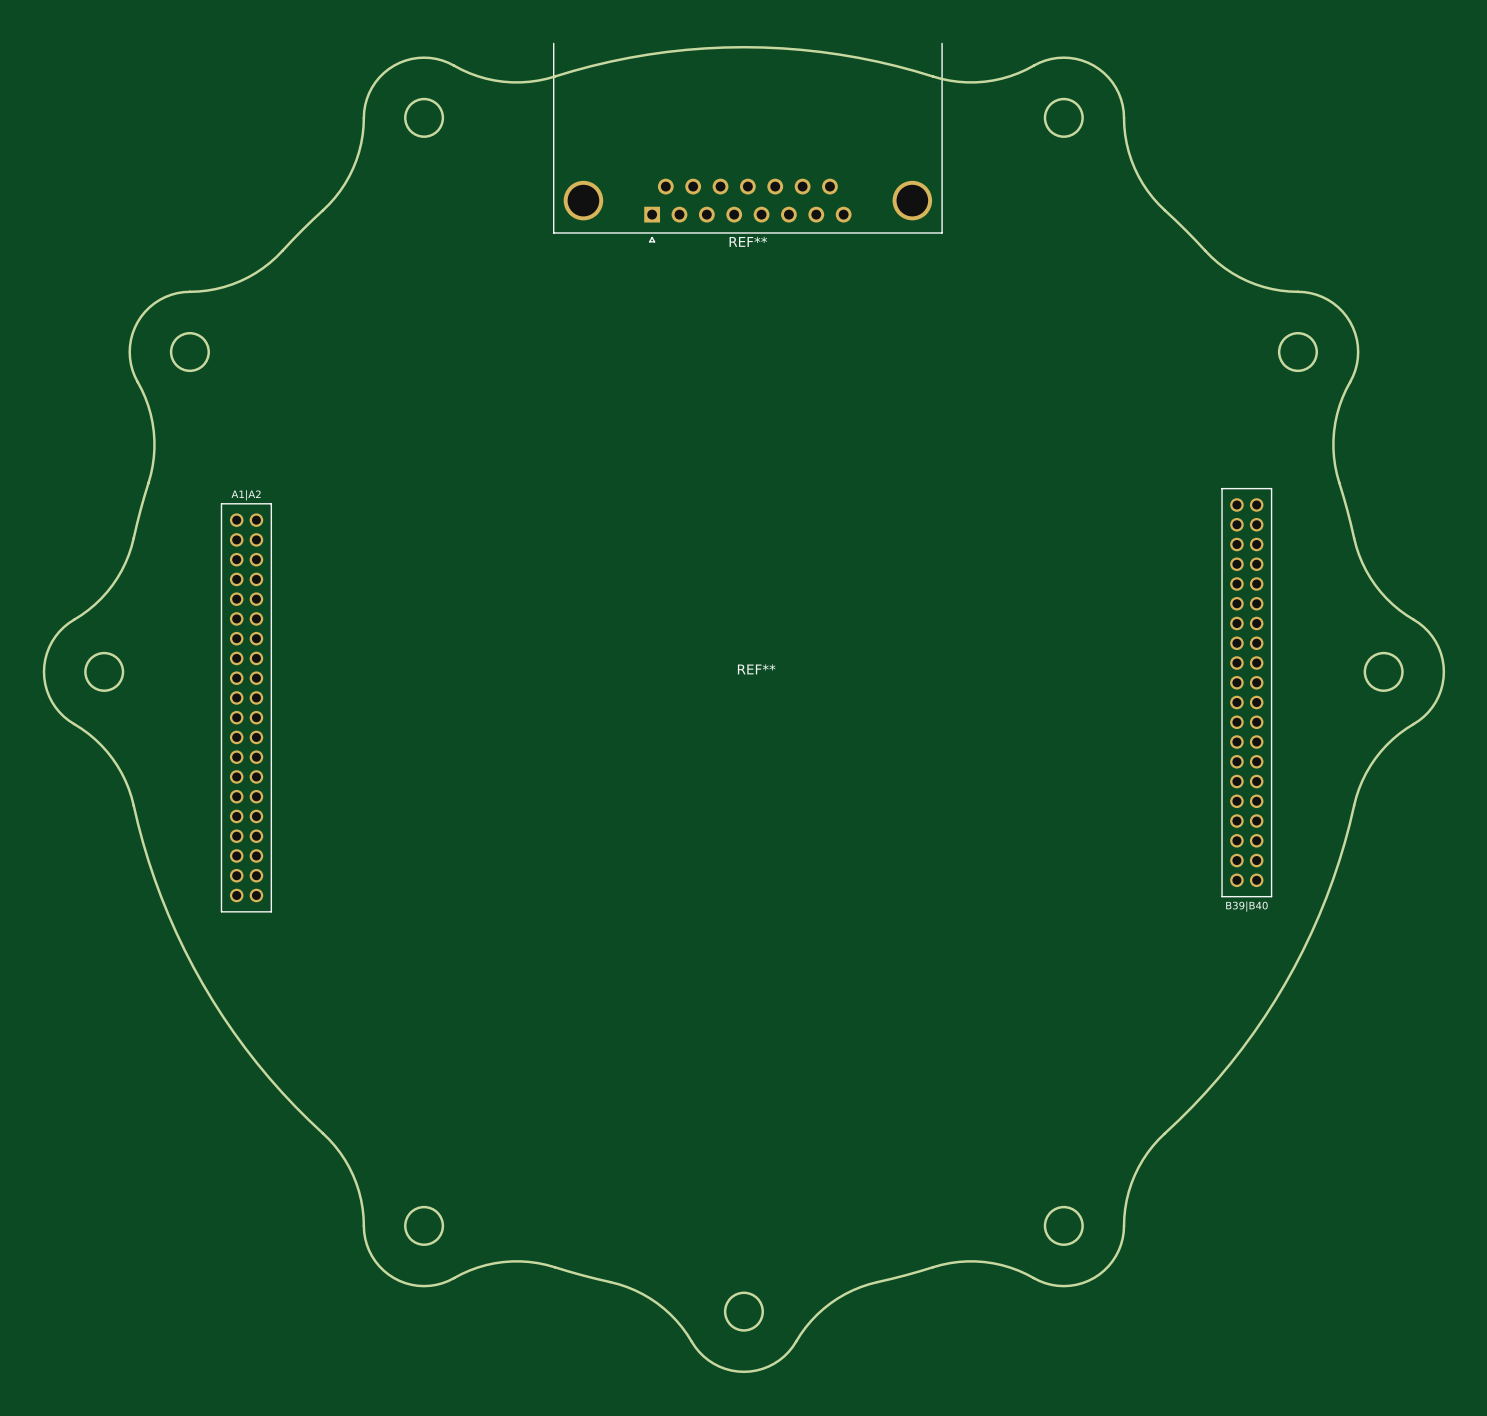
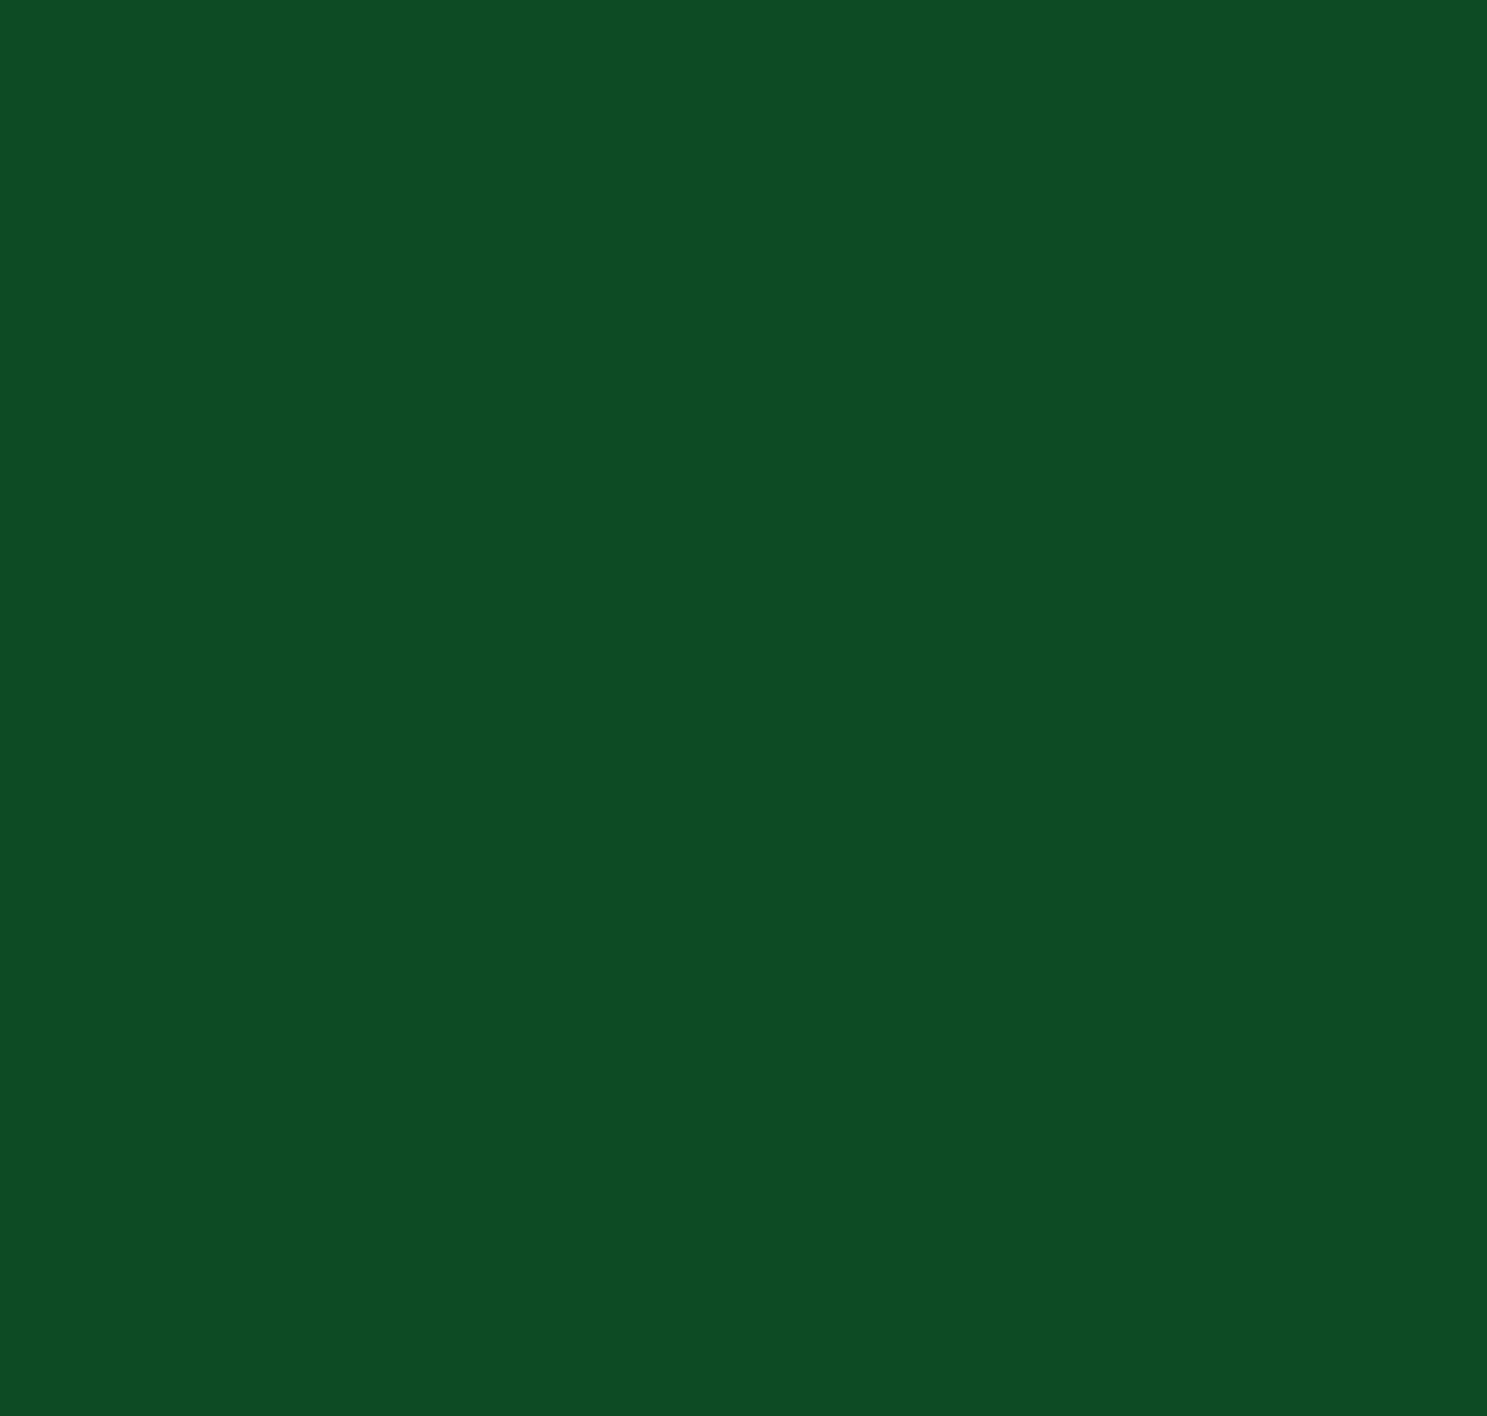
REF**: (747, 142) -> none
REF**: (743, 709) -> none

